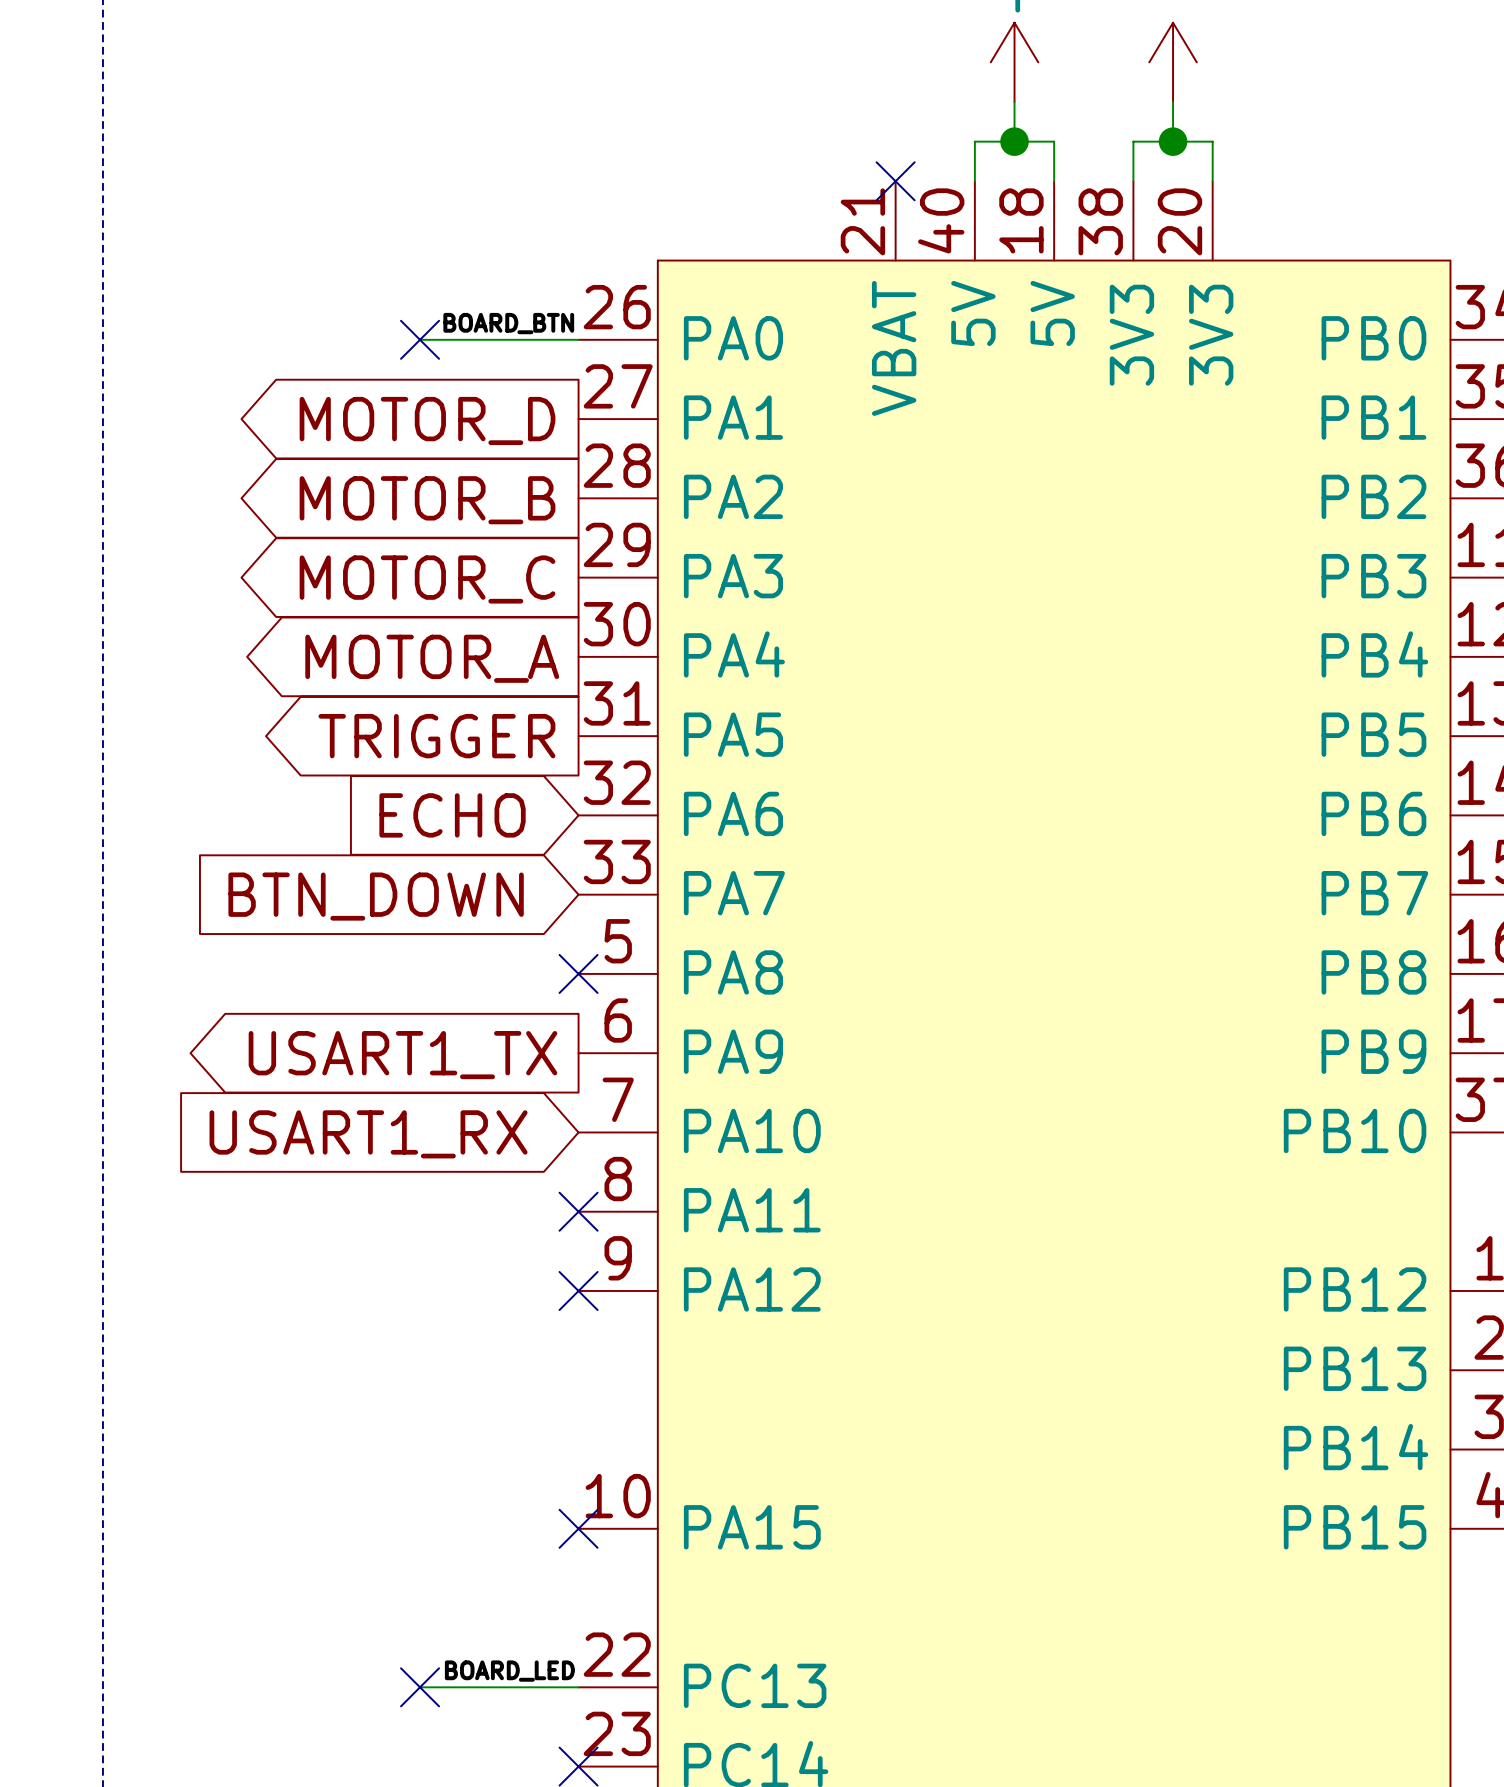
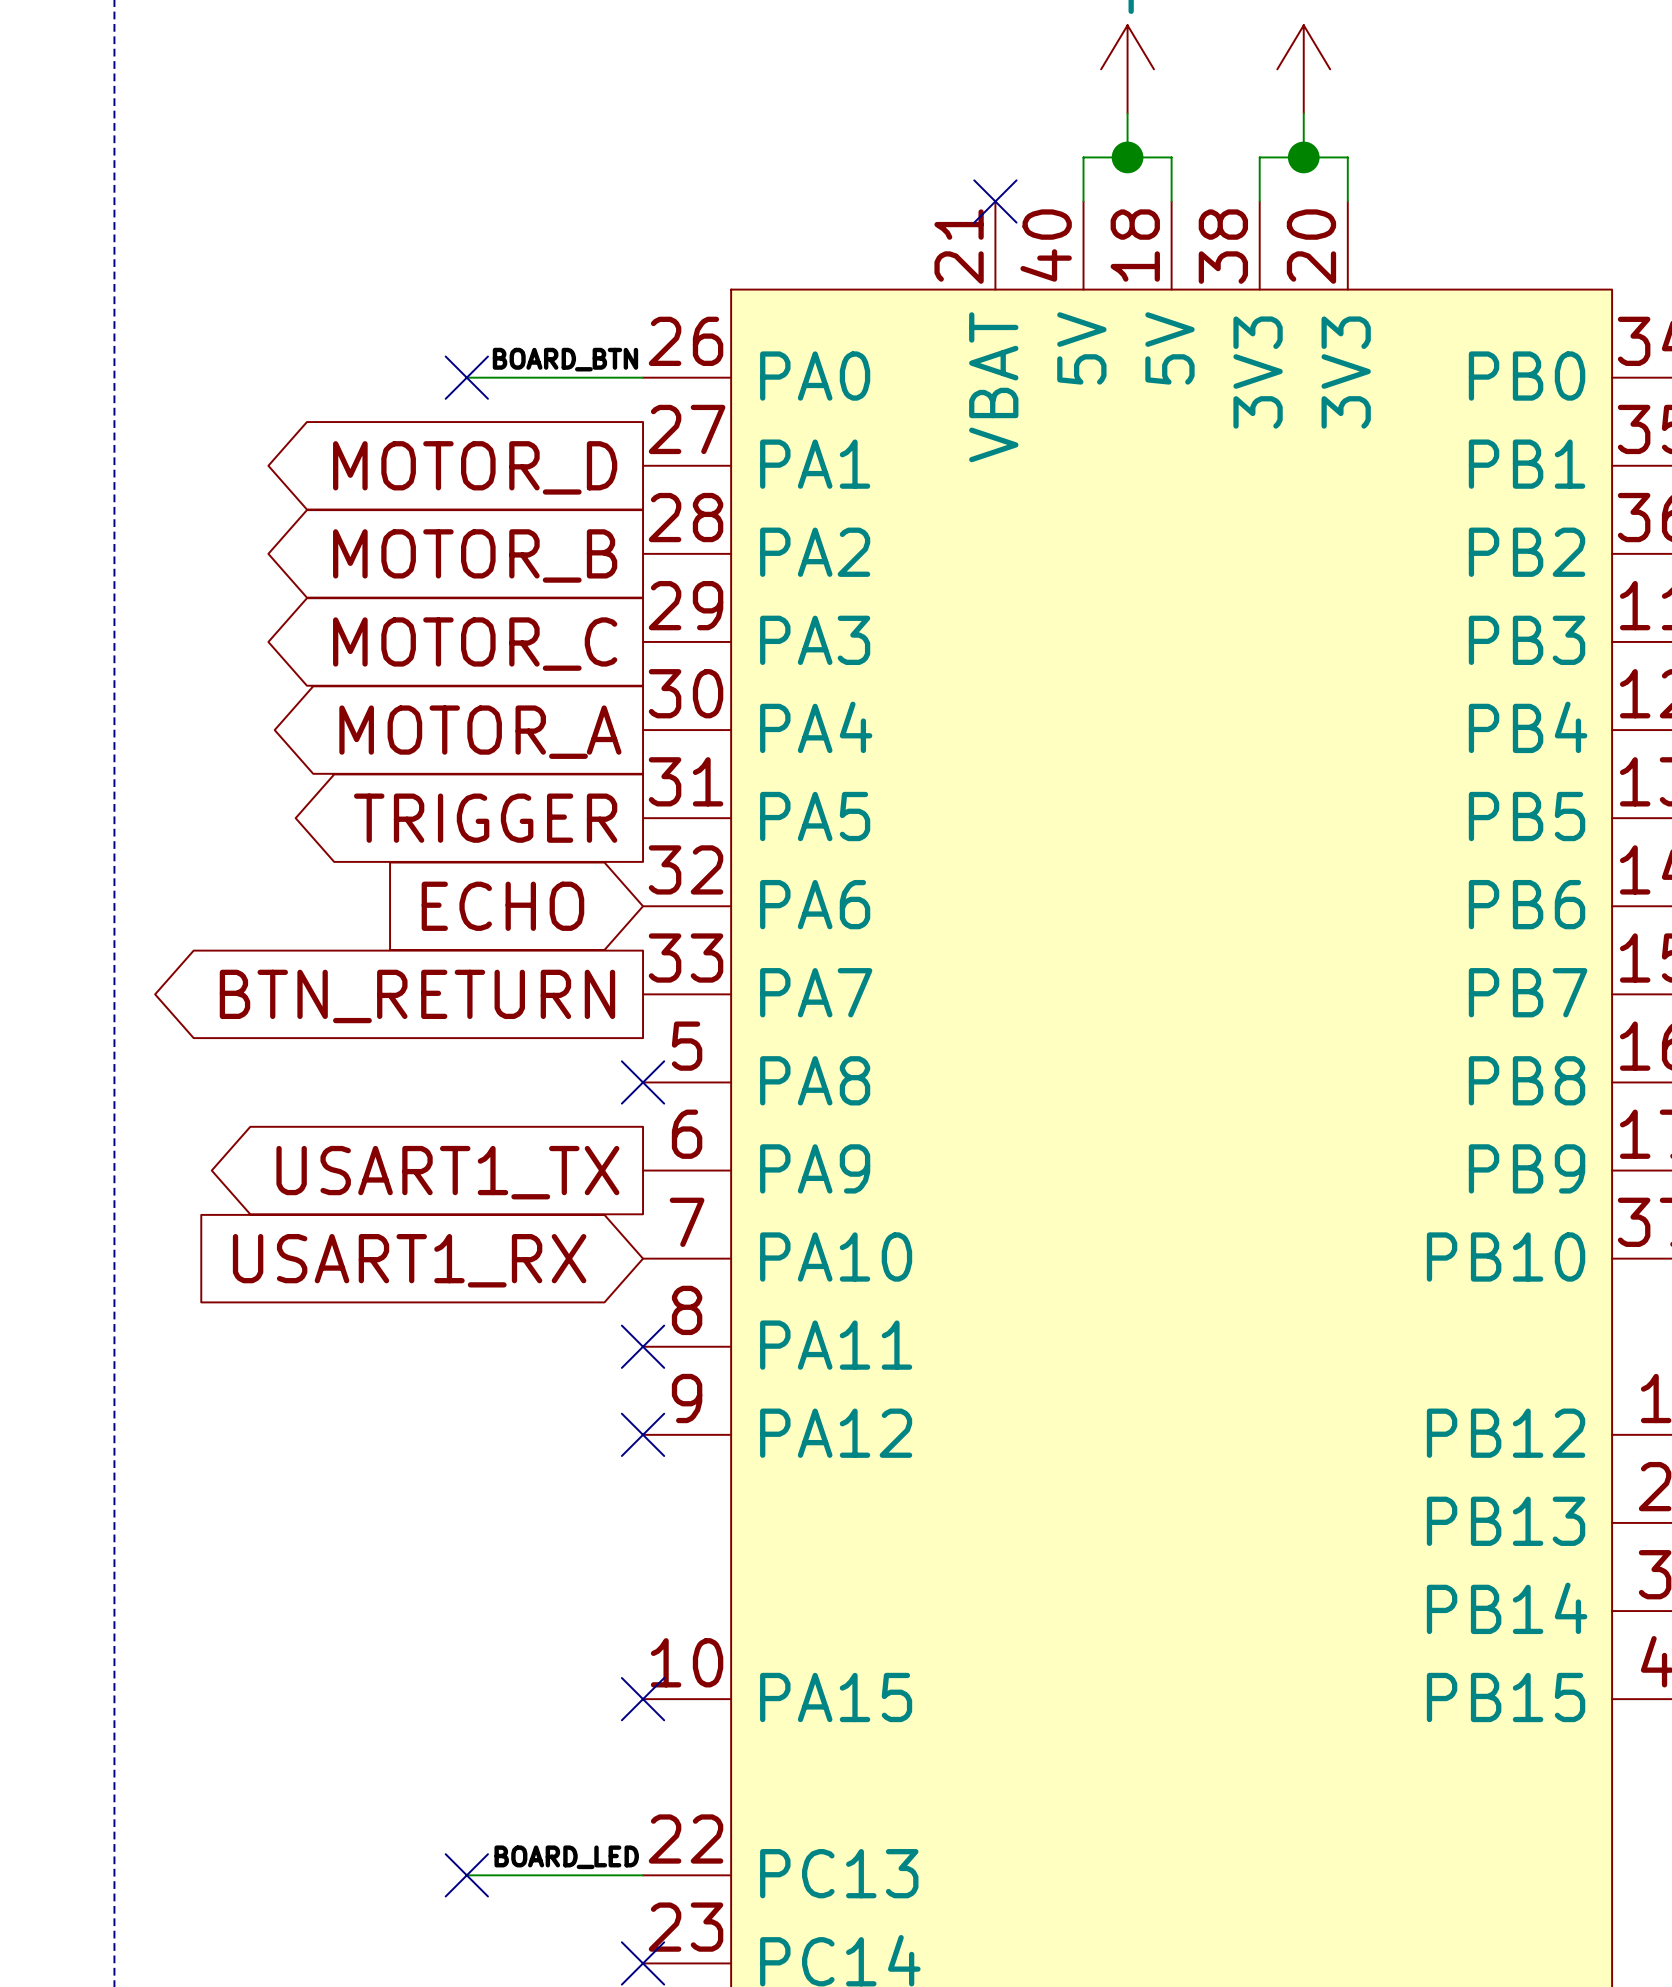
global label shape: input (376, 896) -> output (417, 996)
global label: BTN_DOWN (376, 896) -> BTN_RETURN (417, 996)

